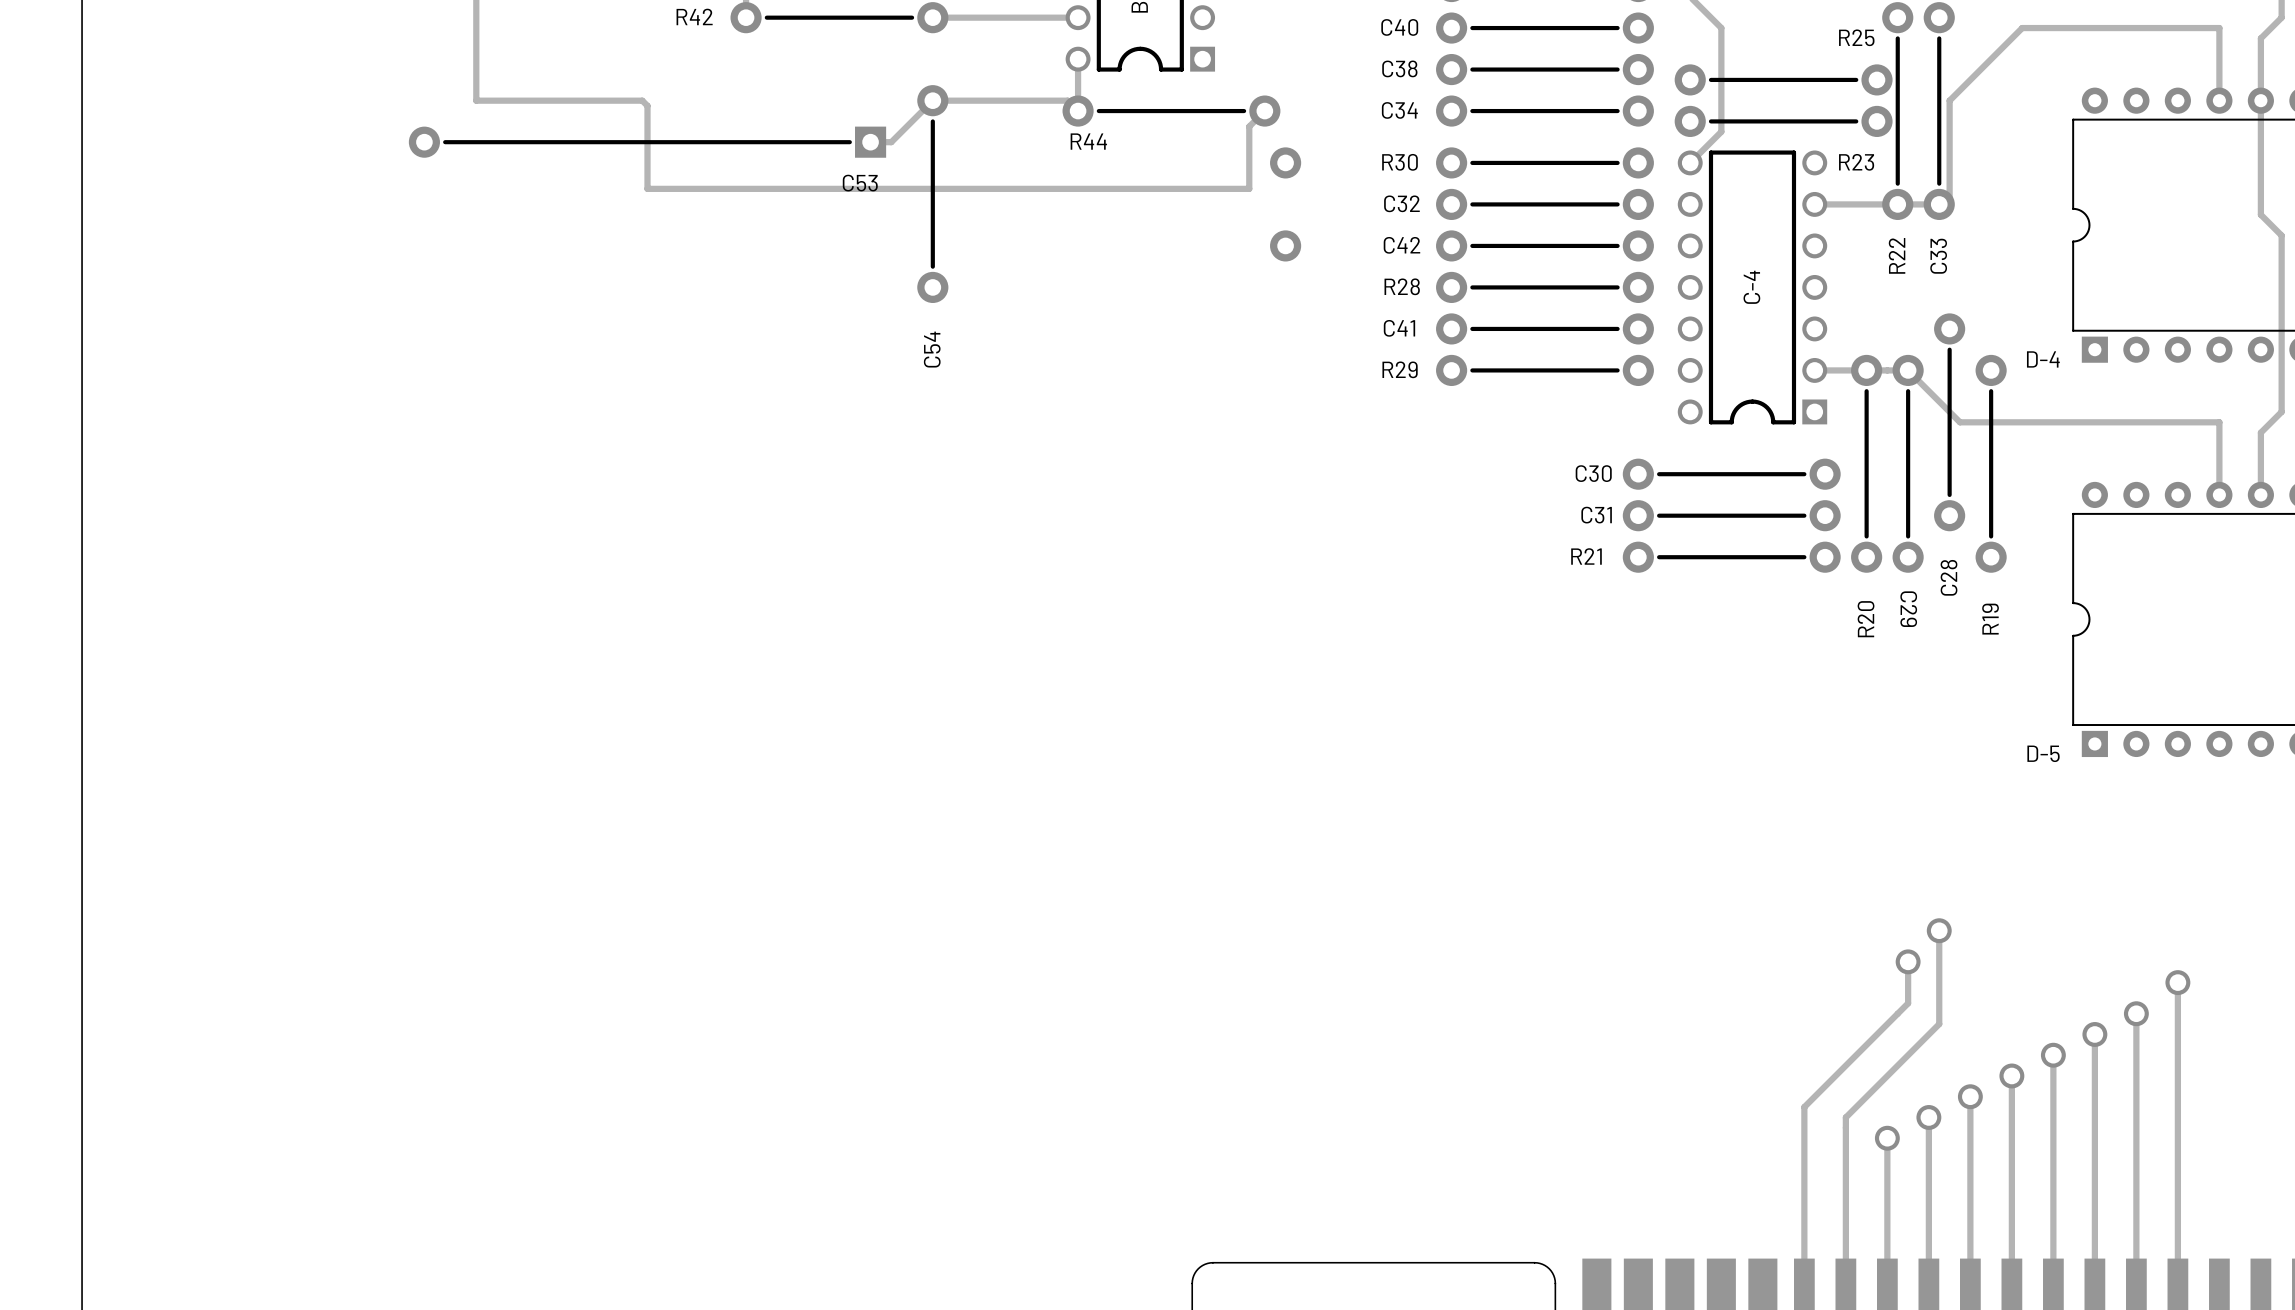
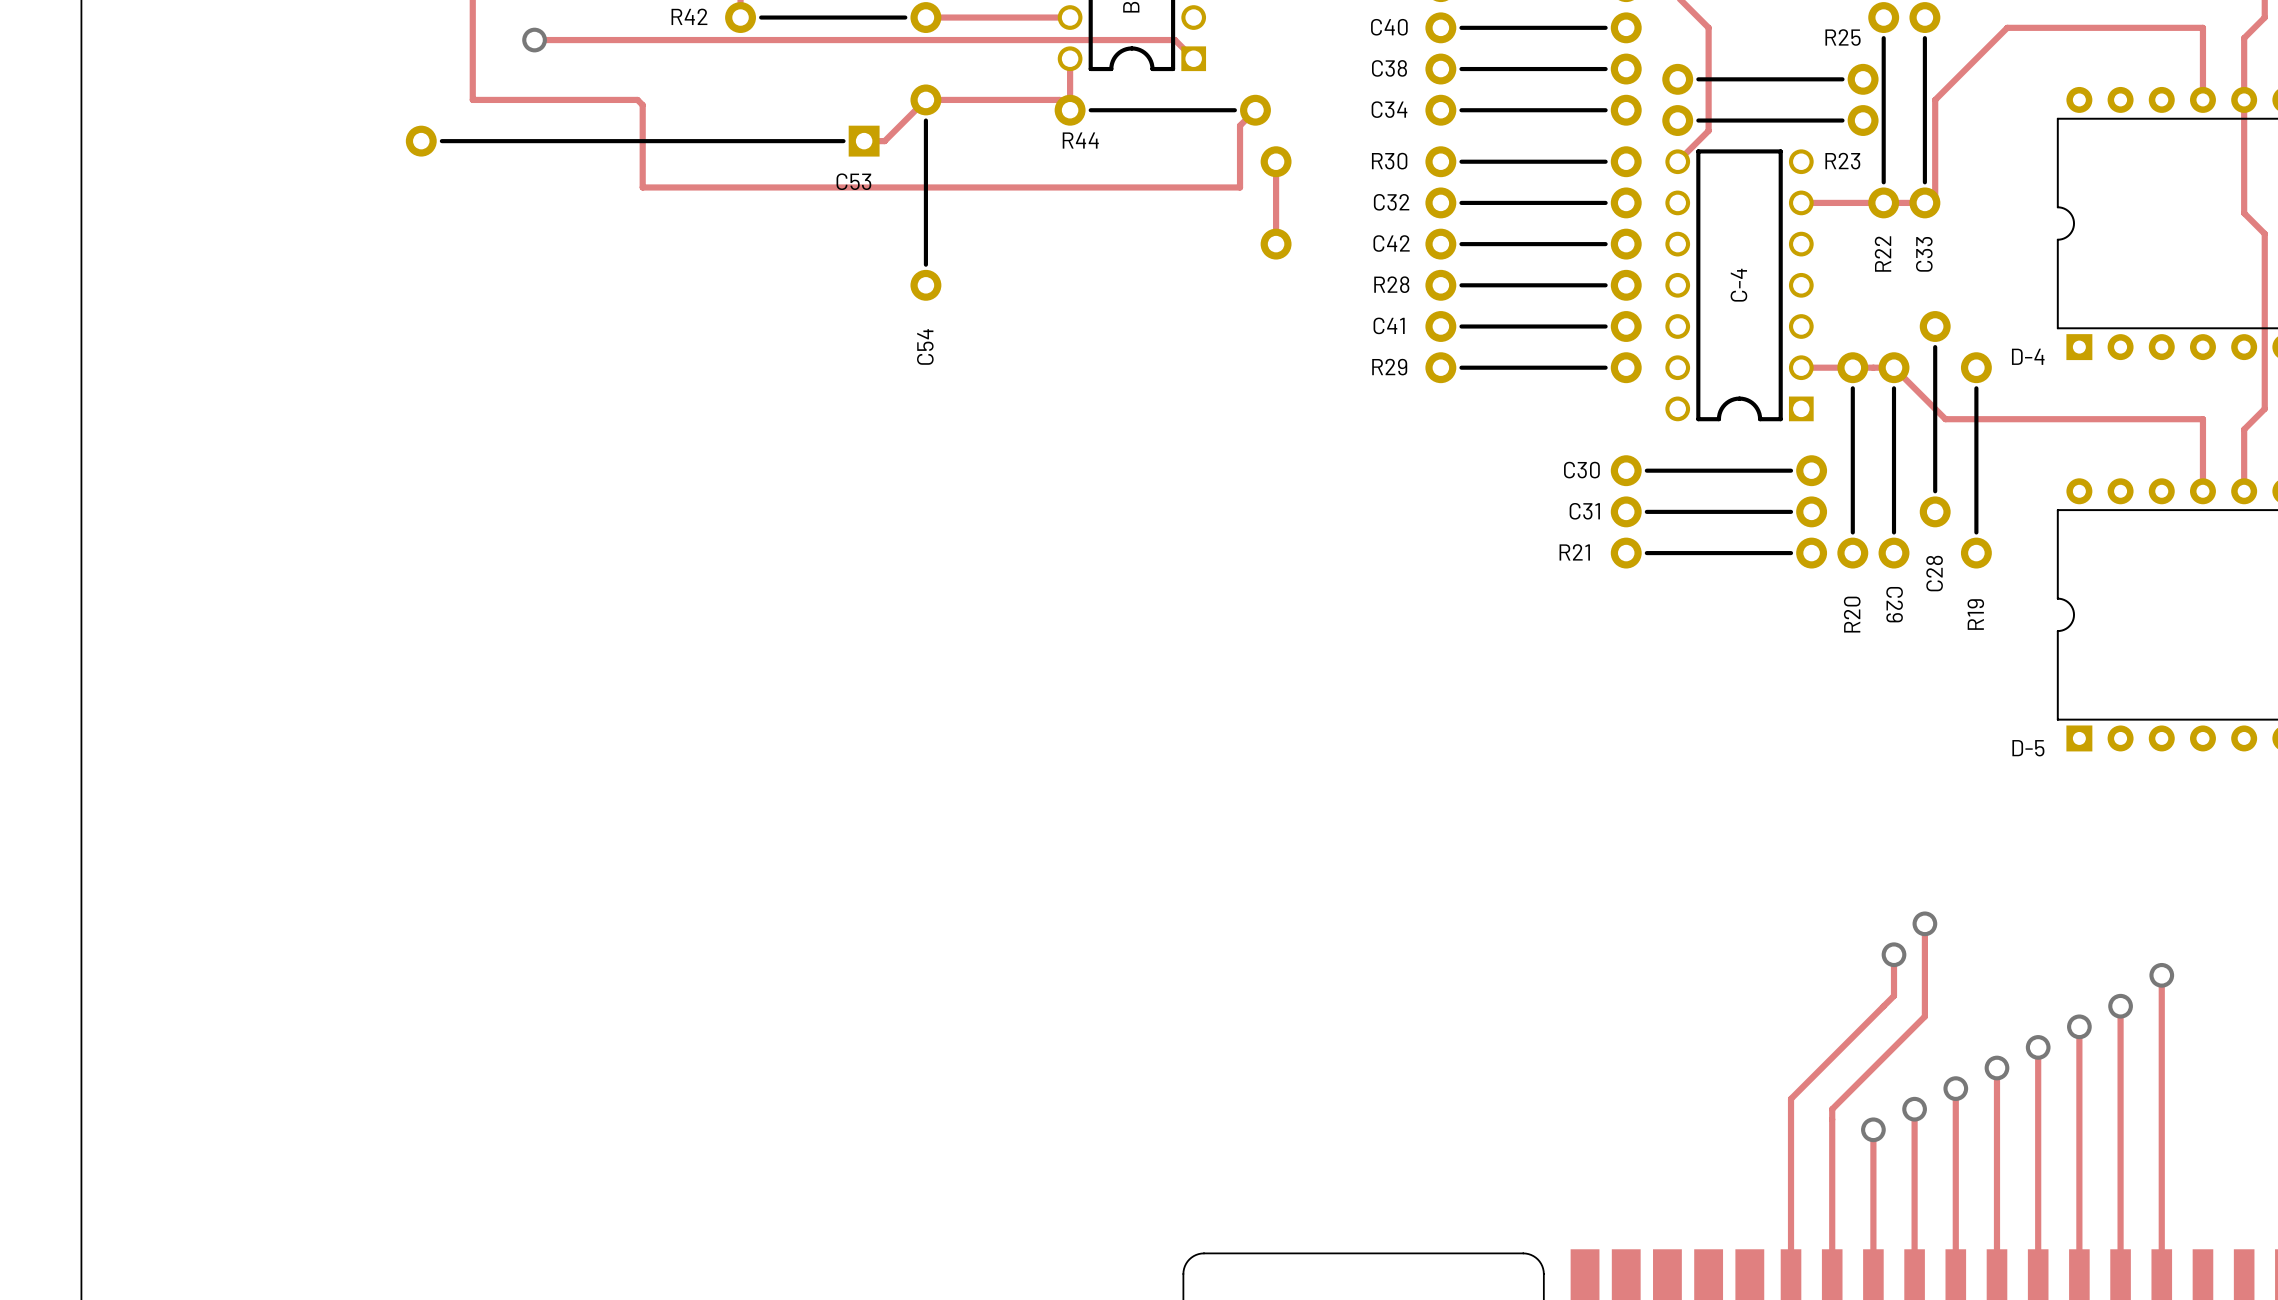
via: none -> (534, 40)
track: none -> (542, 40) (1174, 40) (1193, 58)
track: none -> (1276, 161) (1276, 244)

